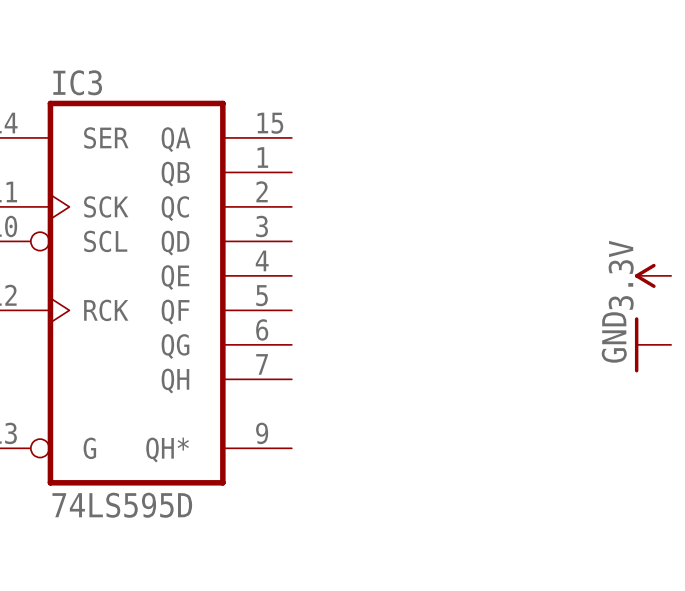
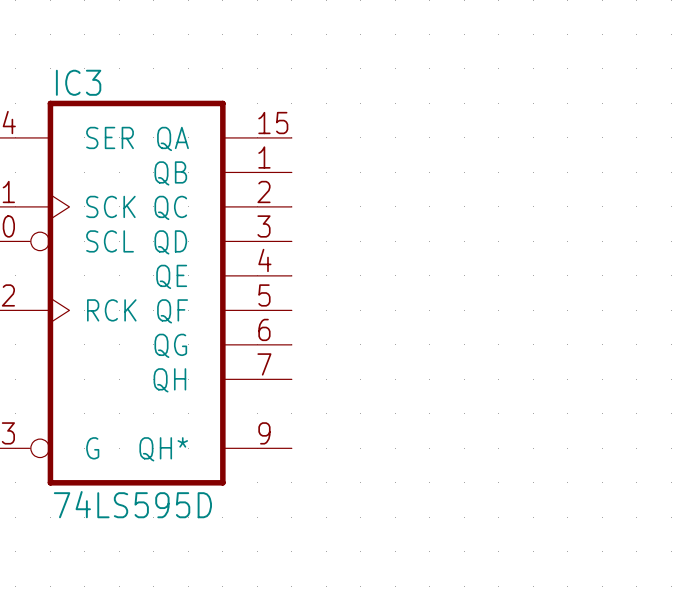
power symbol: 3.3V (653, 275) -> none
power symbol: GND (653, 344) -> none

